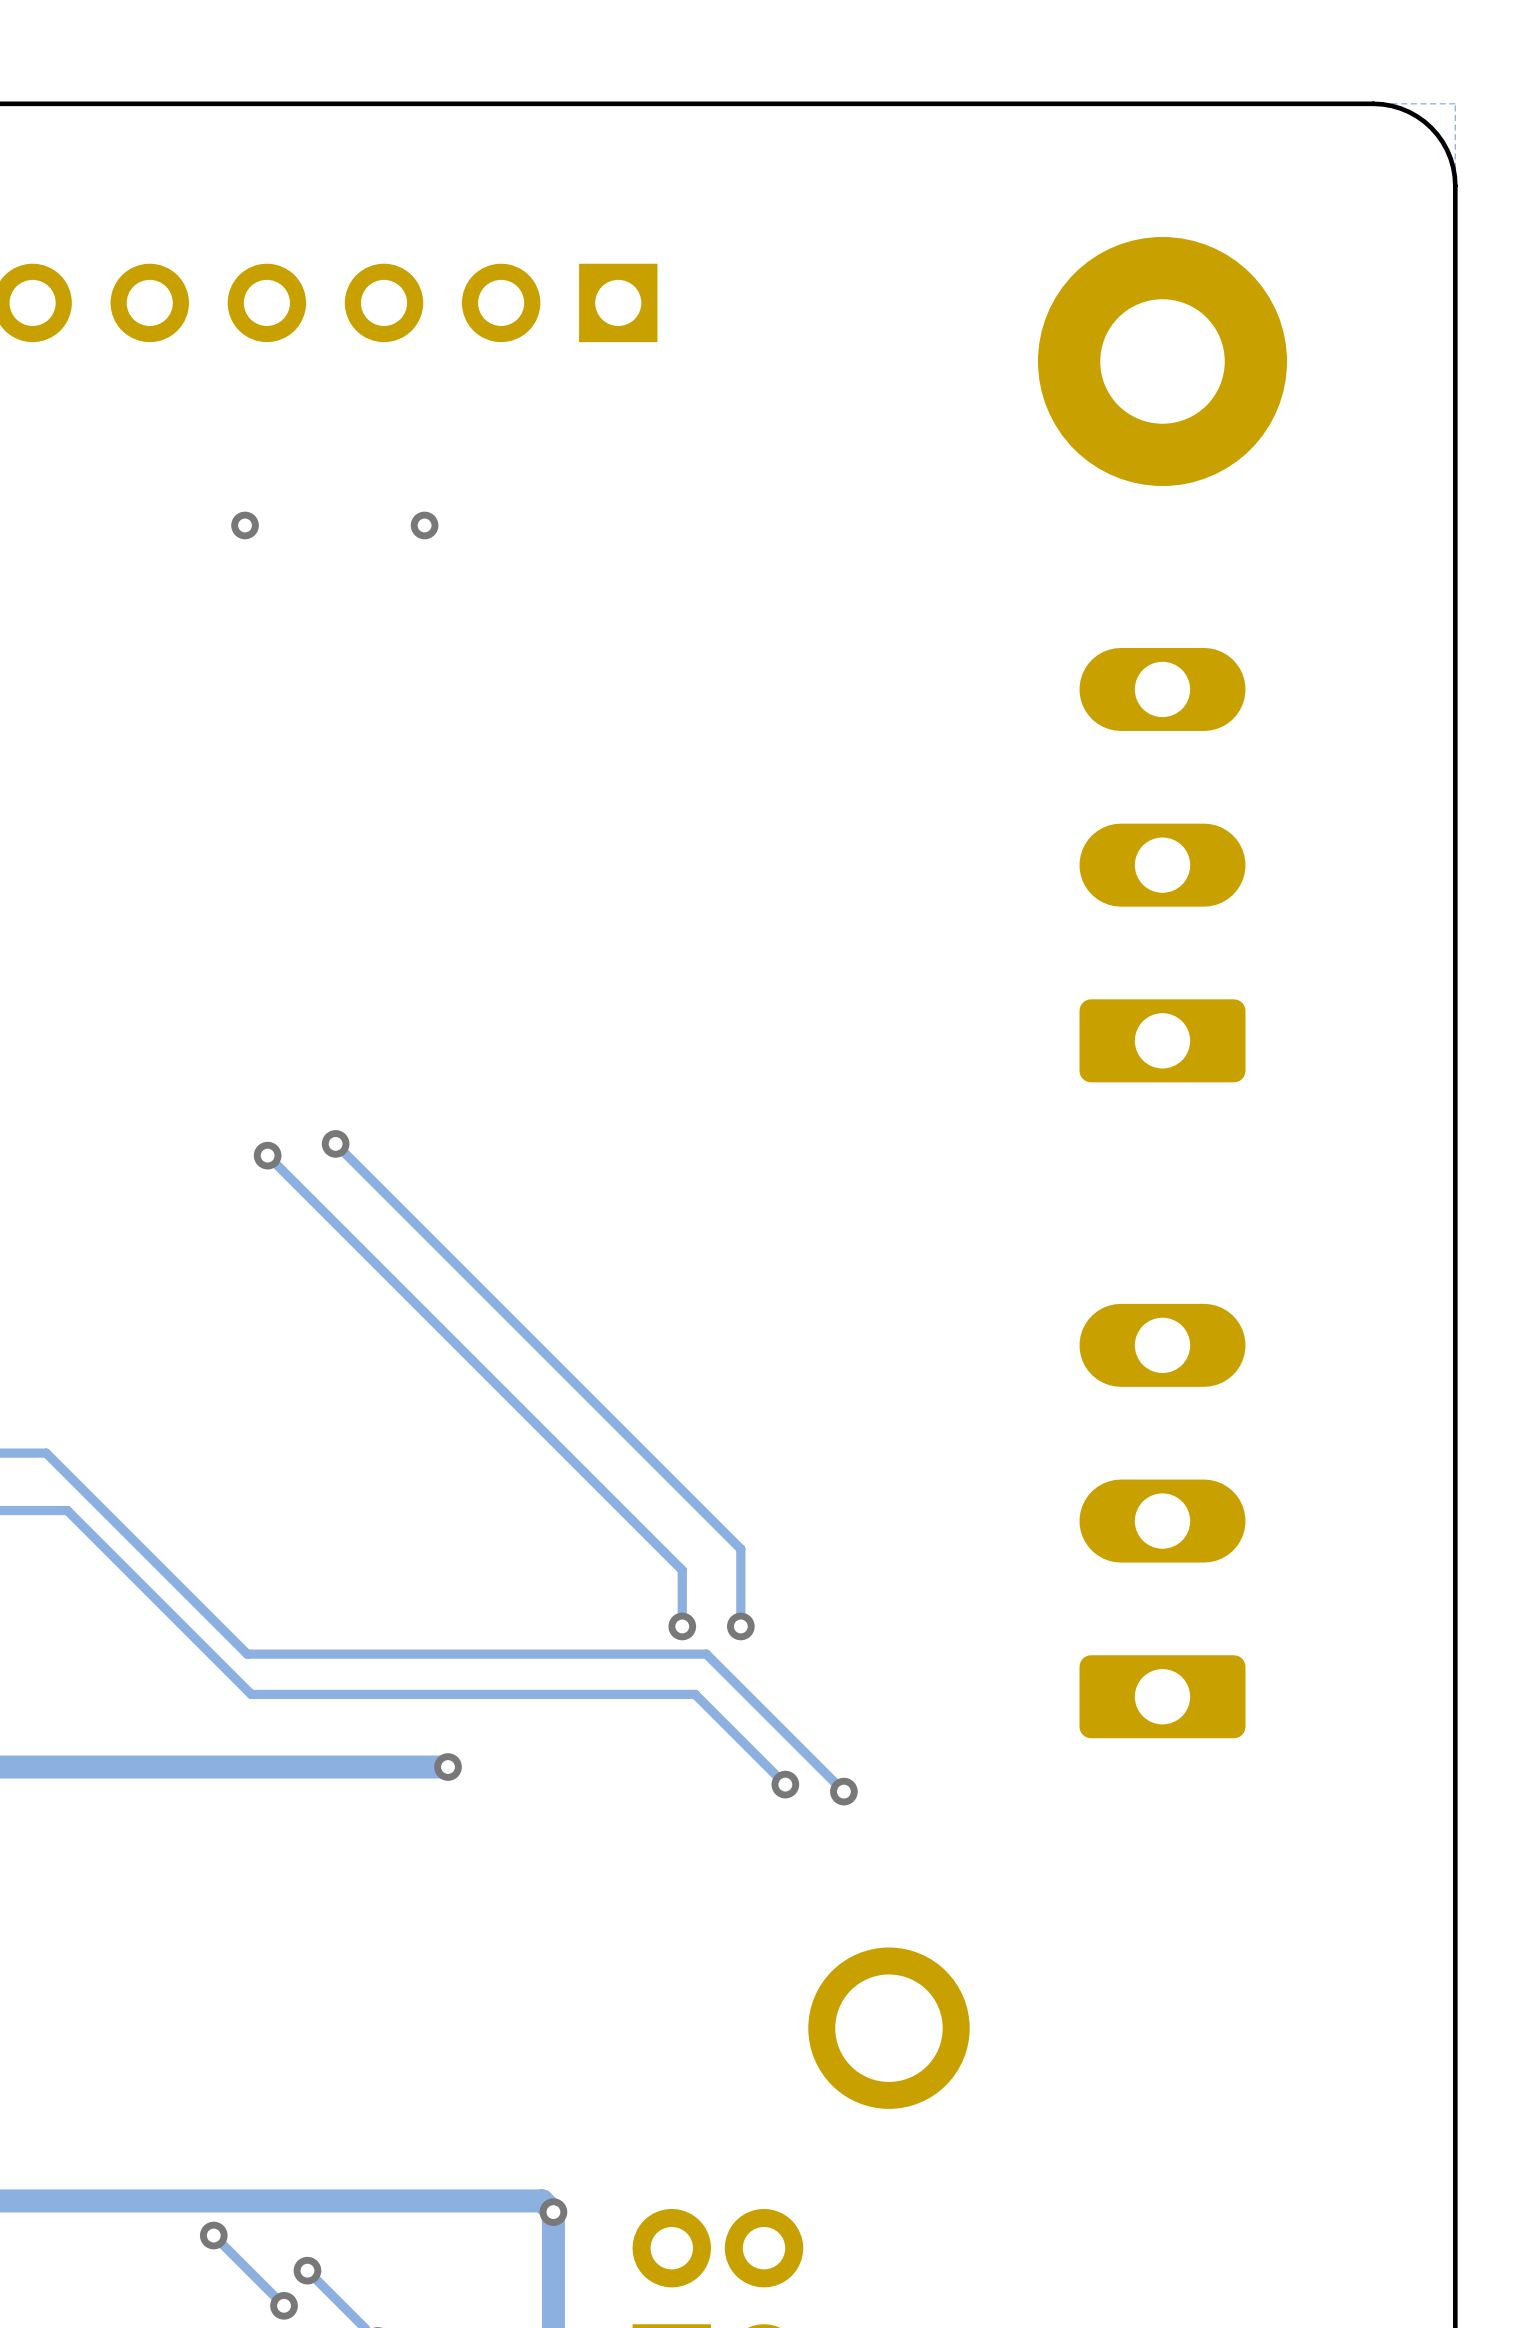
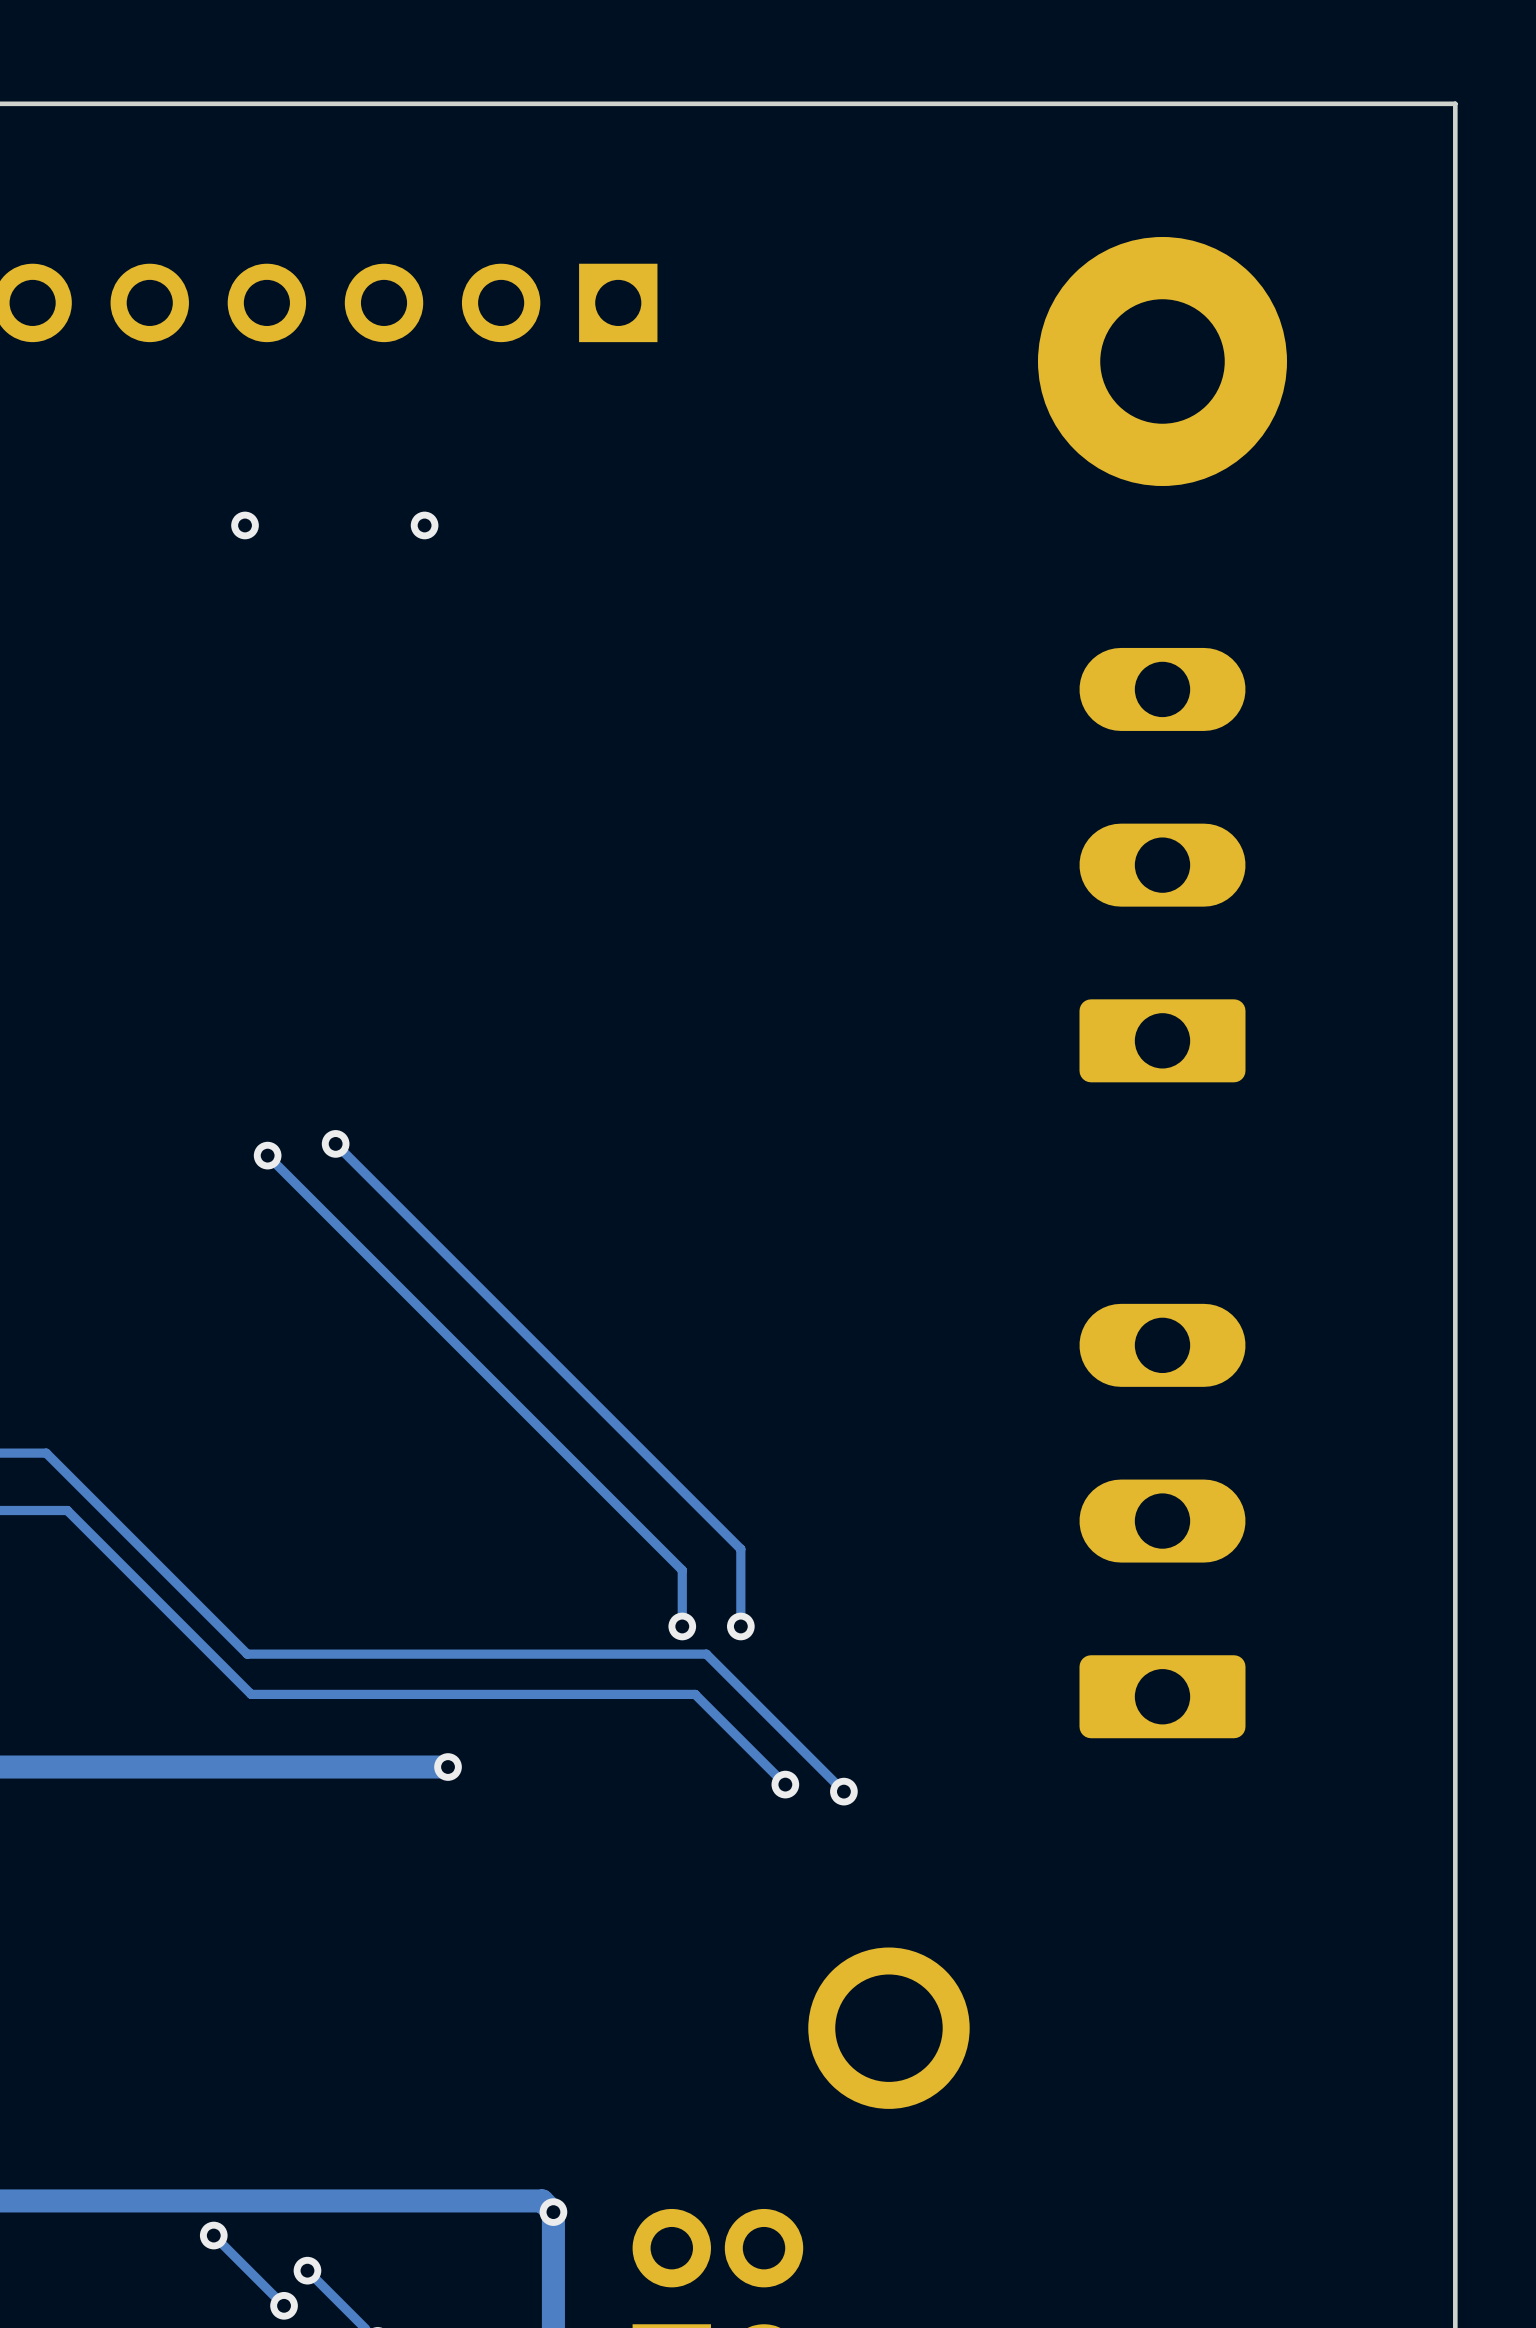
board edge: (1373, 103) (1391, 105) (1408, 111) (1431, 127) (1447, 150) (1453, 167) (1455, 185) -> (1373, 103) (1455, 103) (1455, 185)

